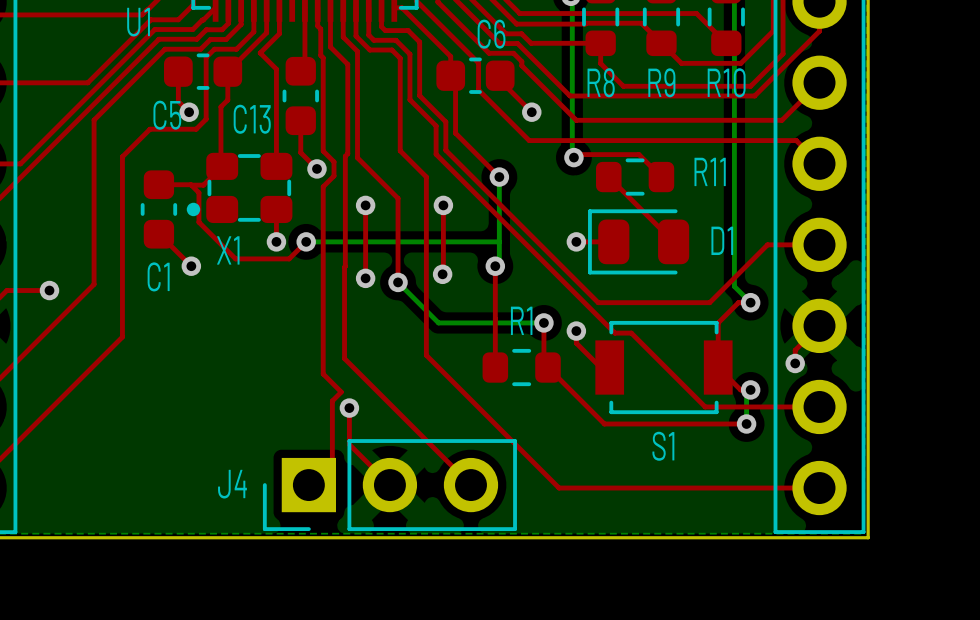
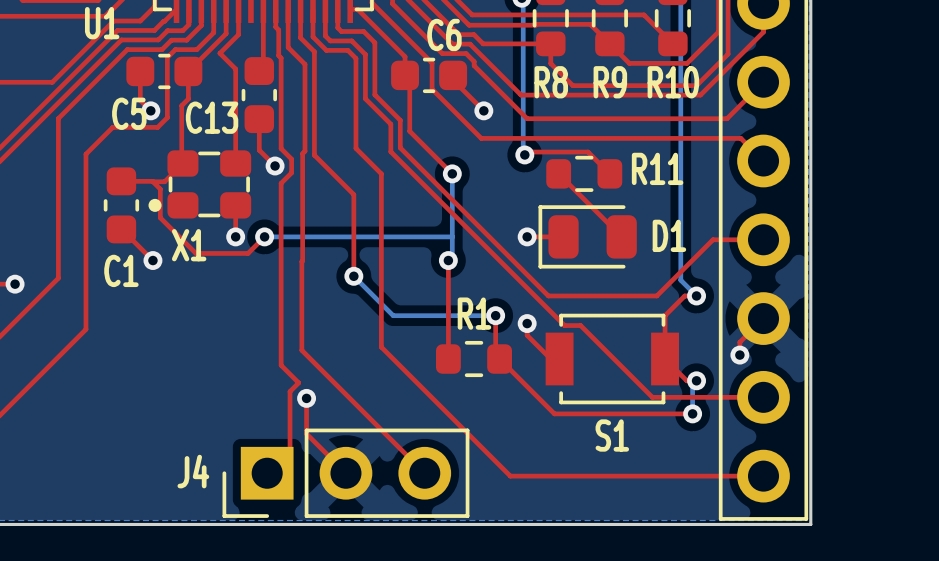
top track: (365, 205) (365, 278) -> none
via: (365, 205) -> none
top track: (442, 205) (442, 274) -> none
via: (443, 205) -> none
via: (442, 274) -> none
via: (365, 278) -> none

